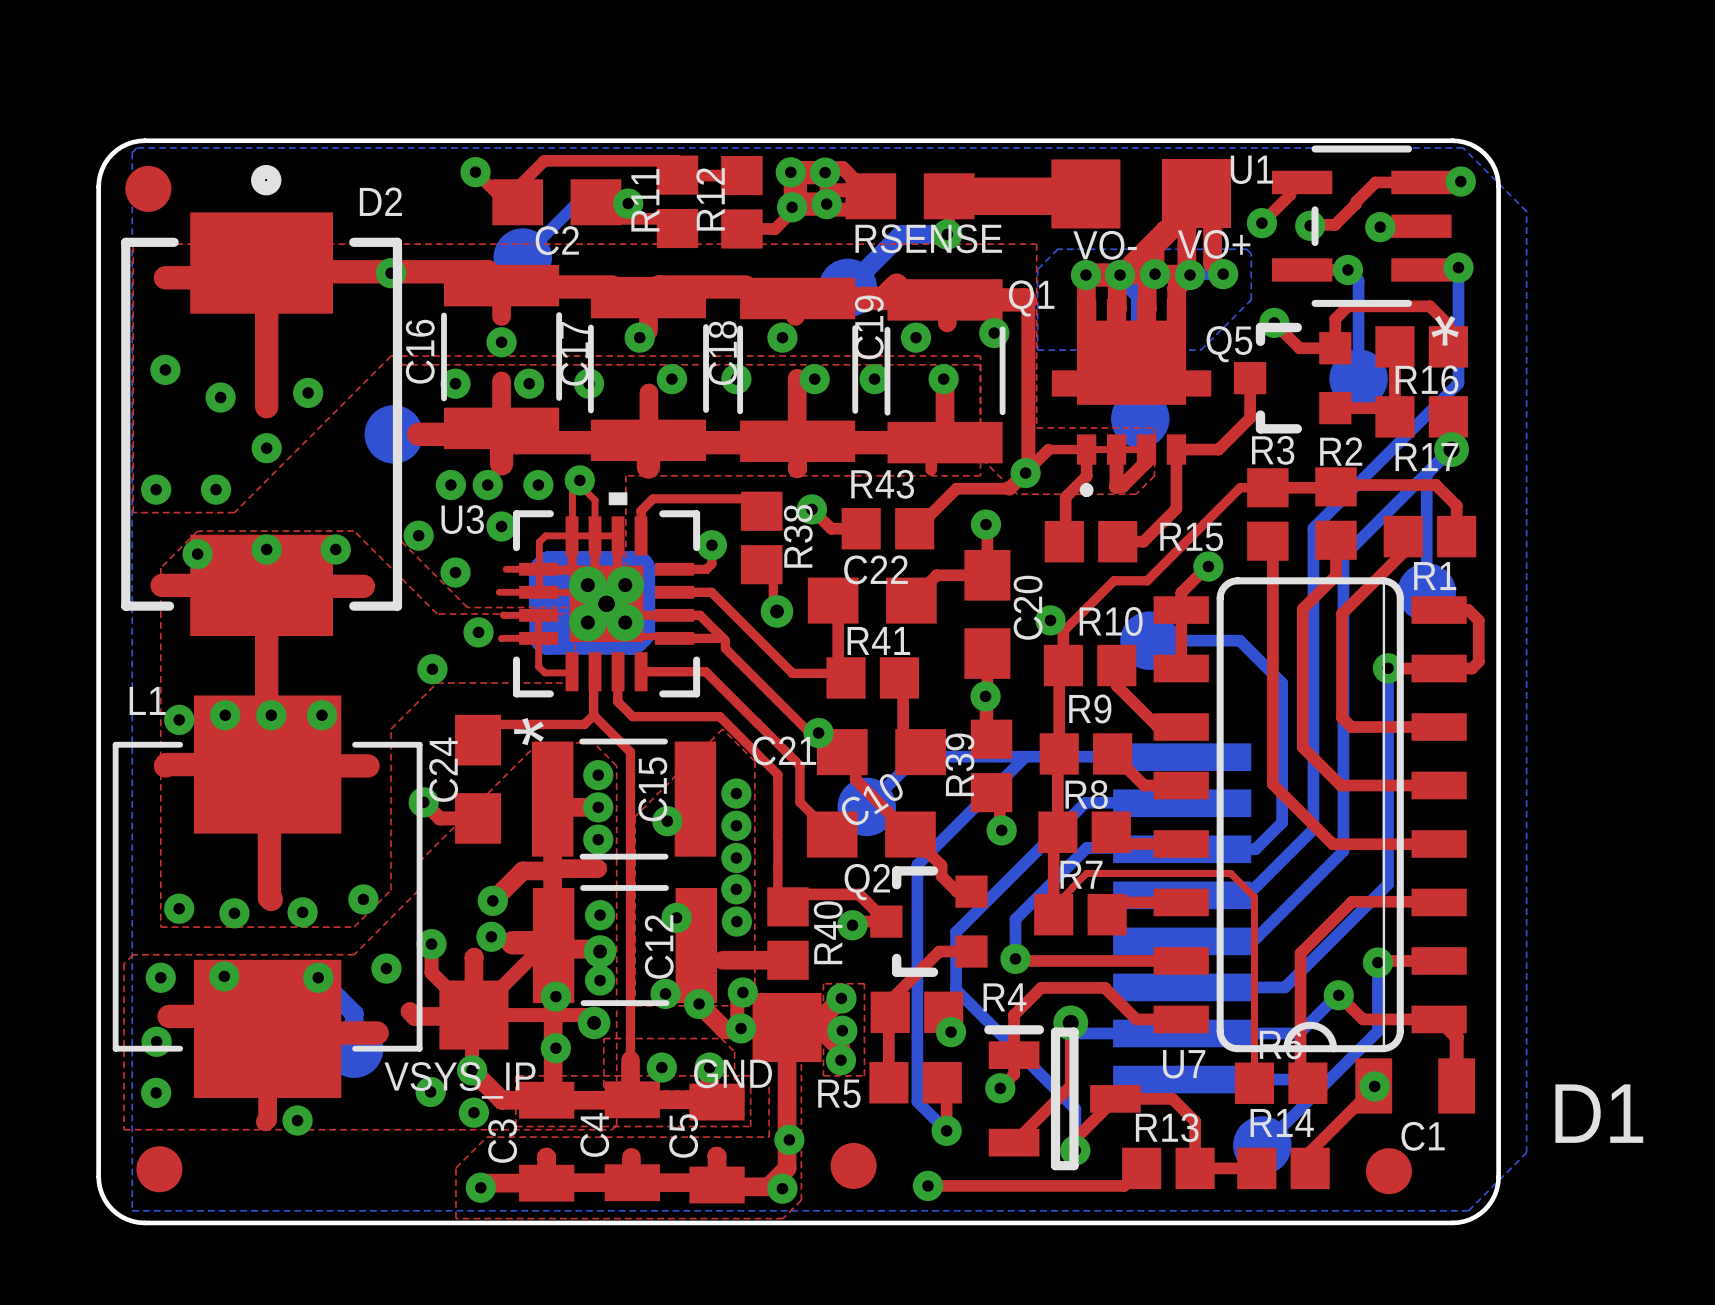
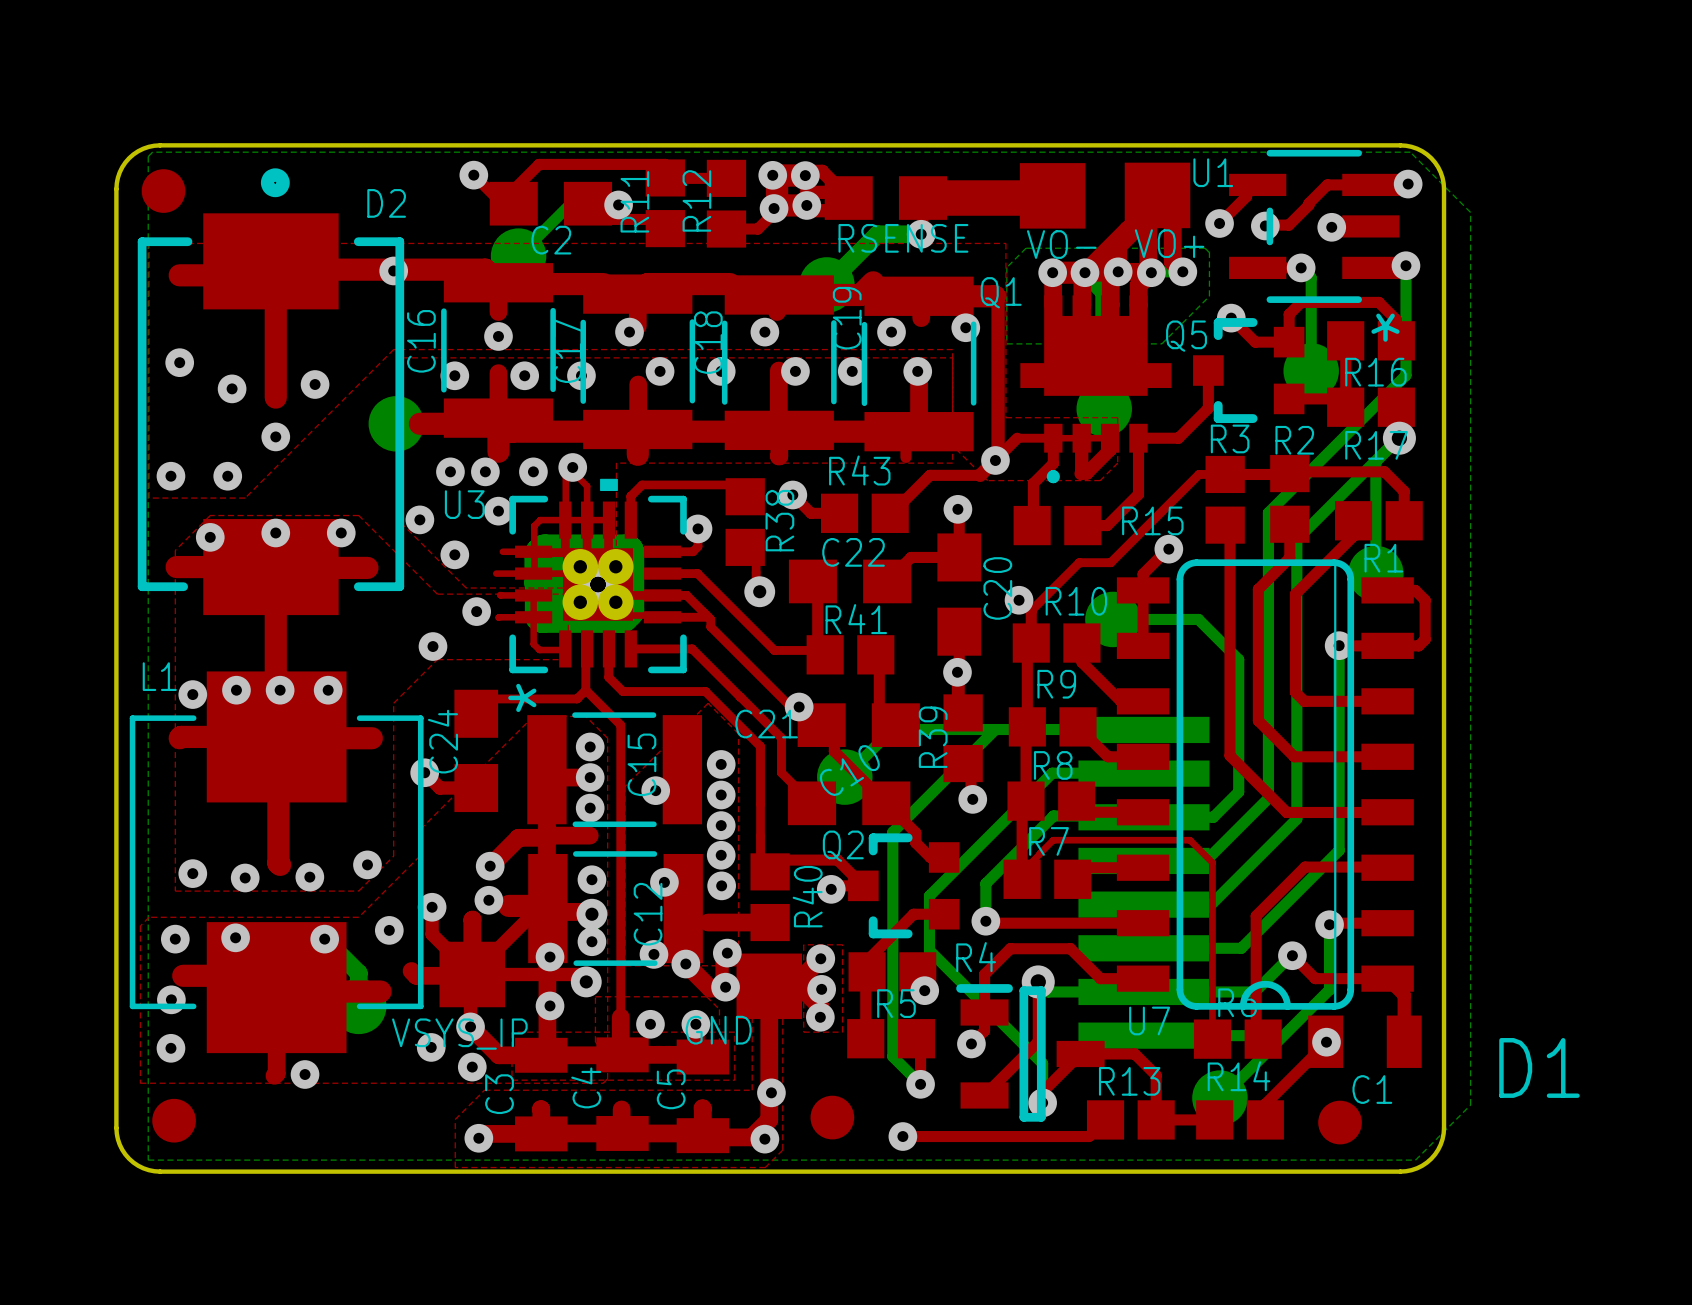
R5 name position: R5 (839, 1093) -> R5 (896, 1003)

